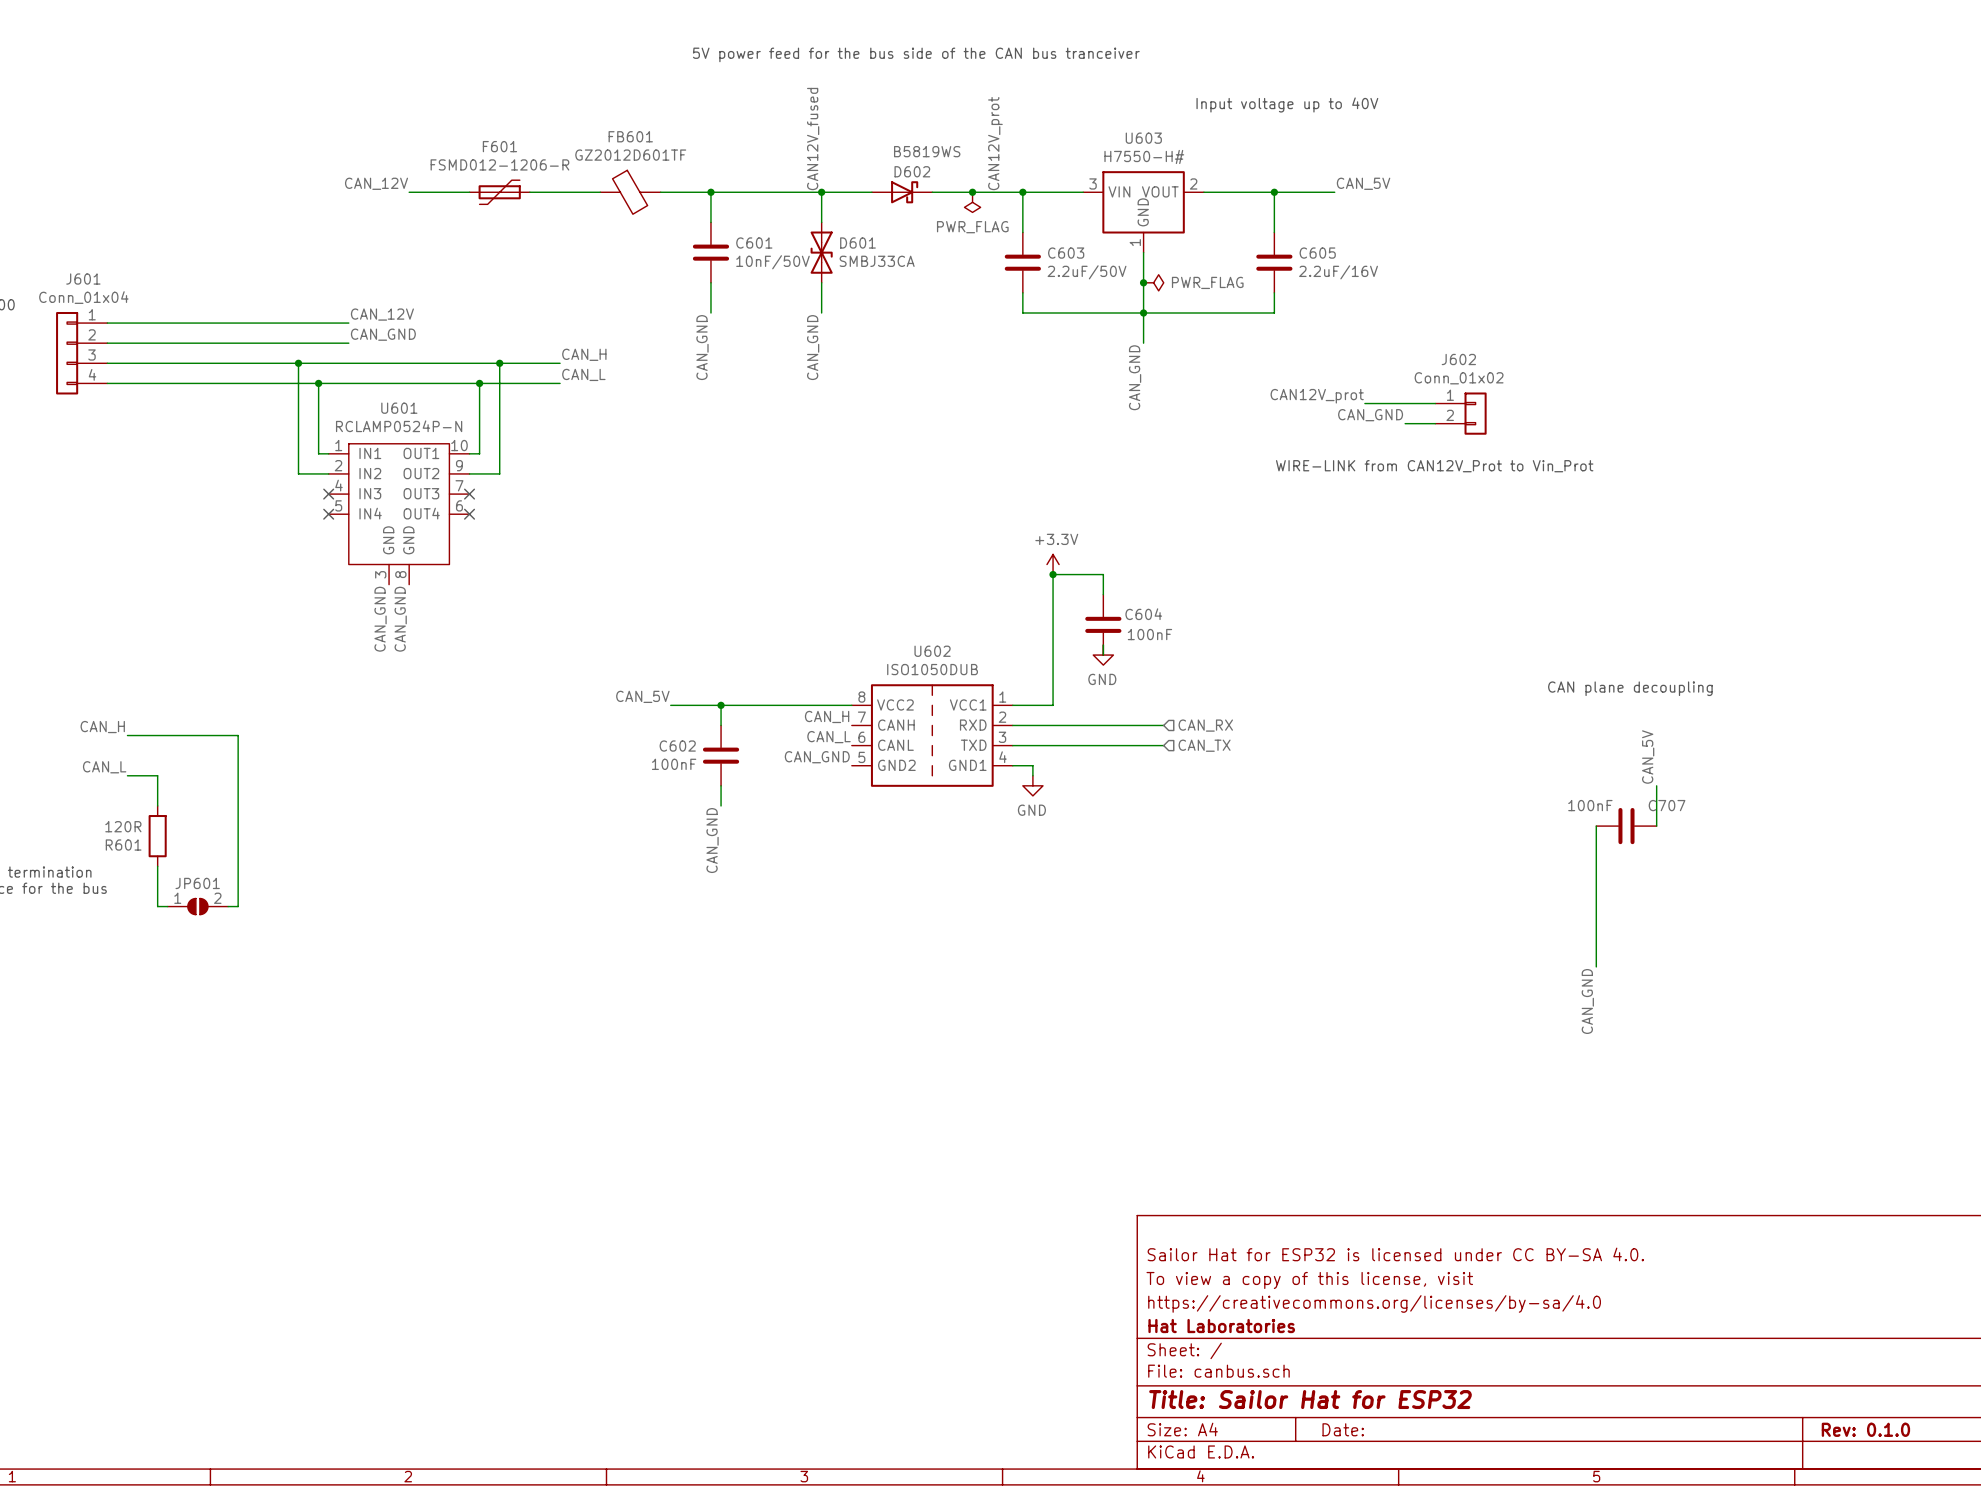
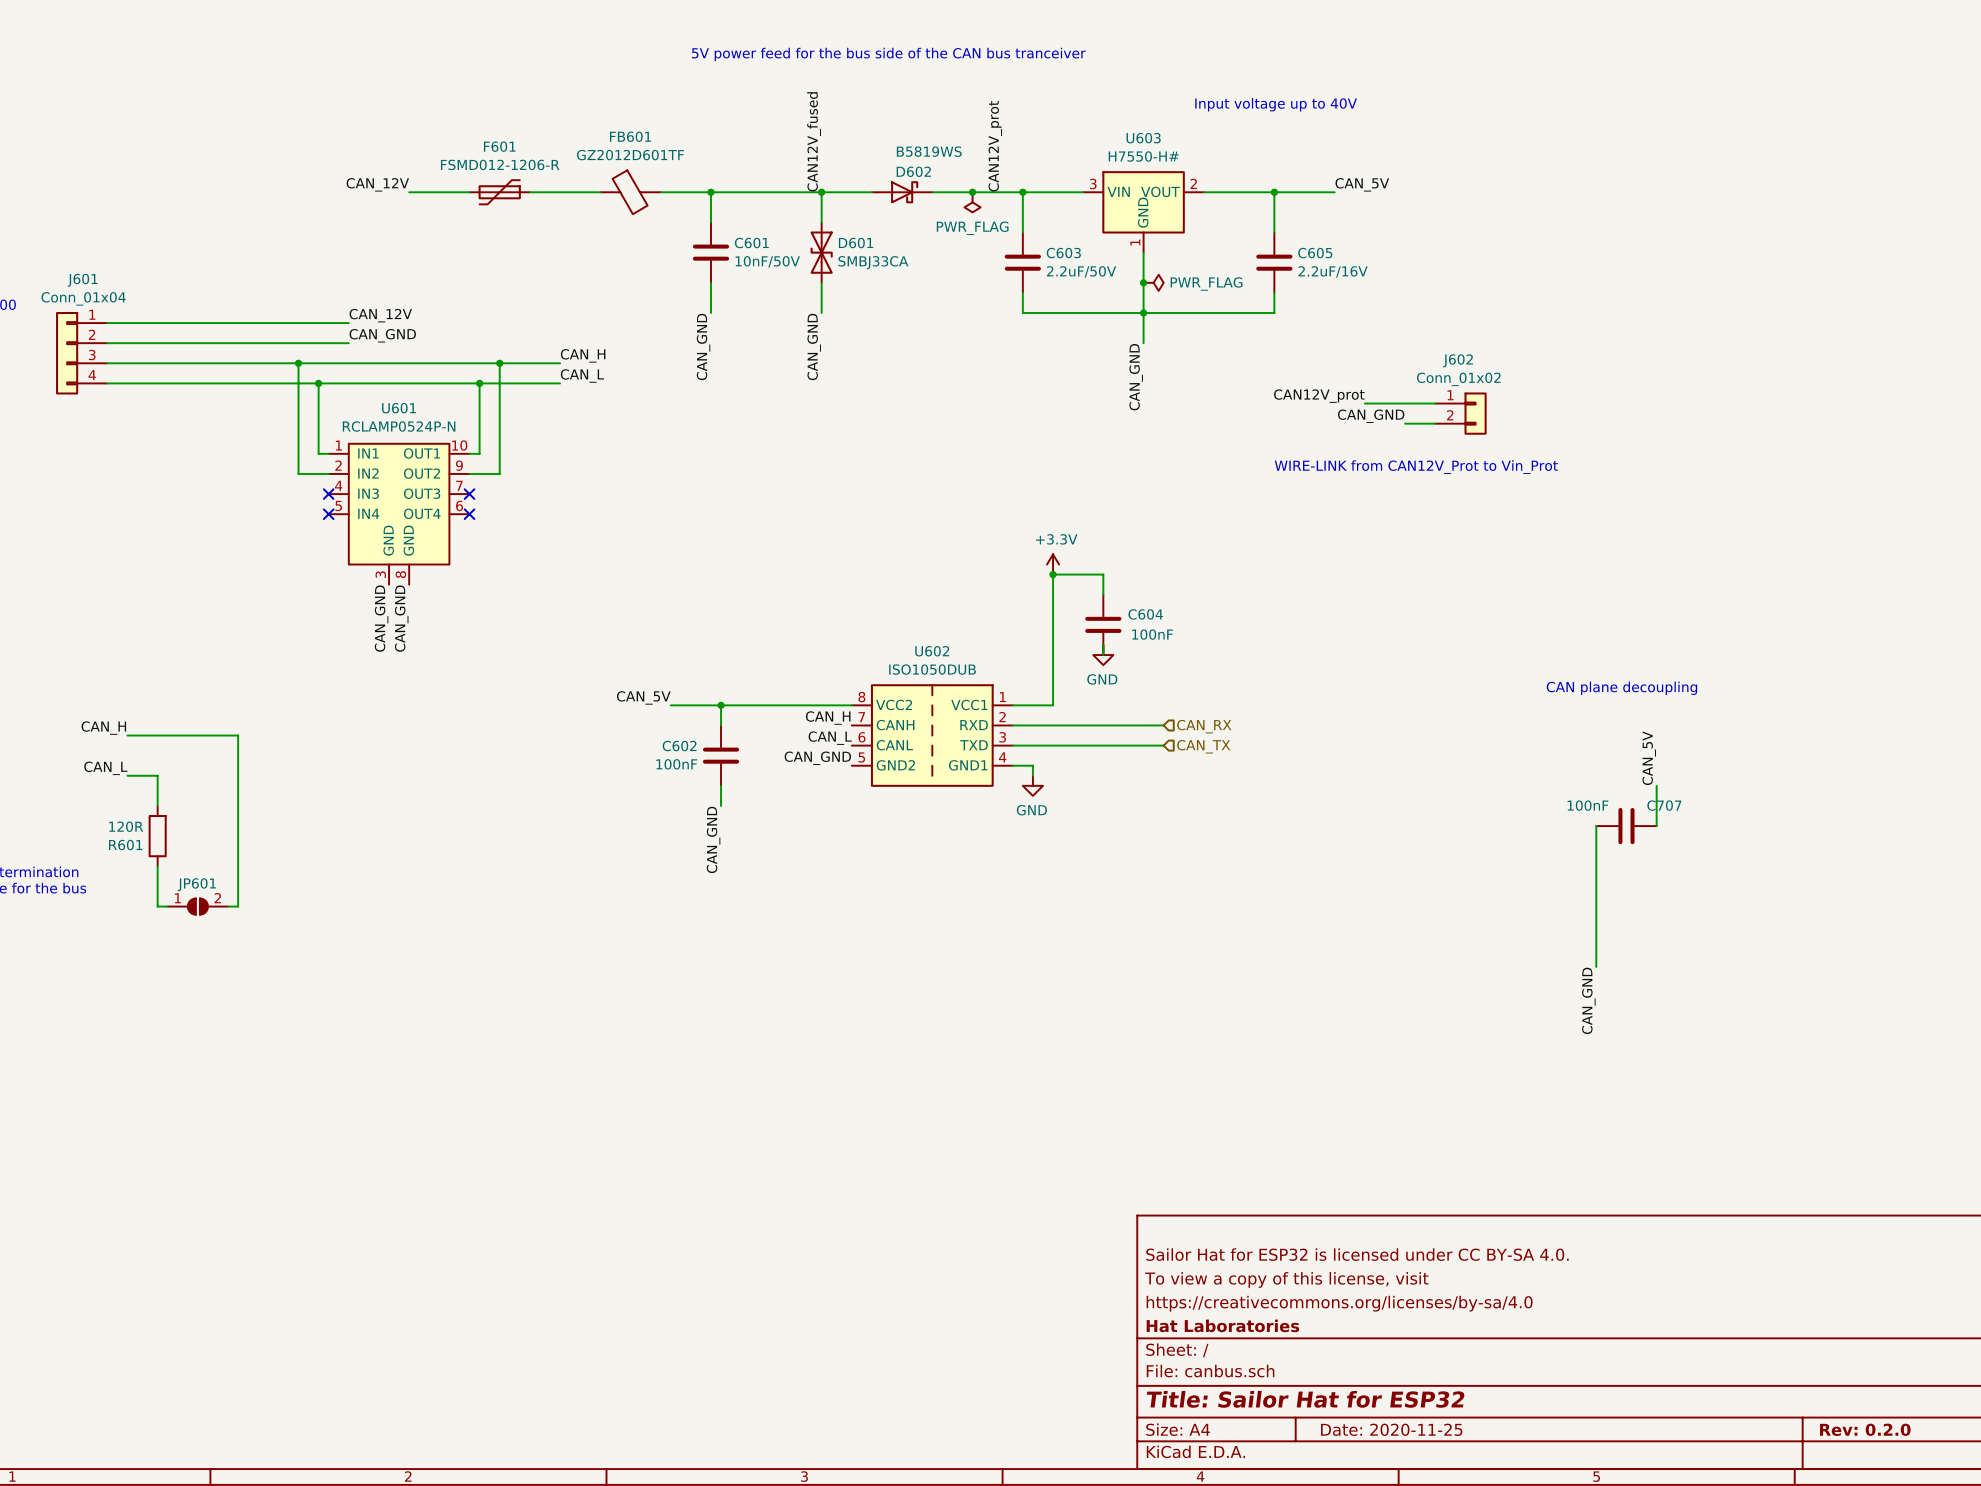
title block: Date: (1343, 1429) -> Date: 2020-11-25 (1391, 1429)
title block: Rev: 0.1.0 (1865, 1429) -> Rev: 0.2.0 (1865, 1429)

